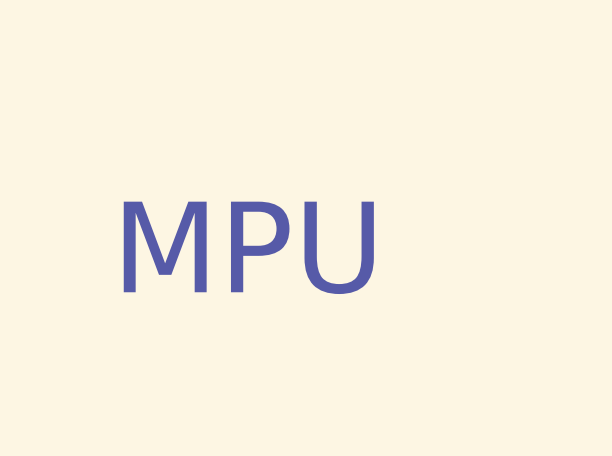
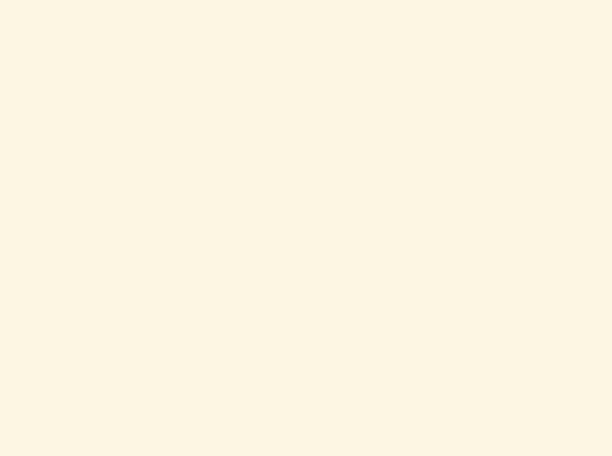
text: MPU (248, 247) -> none

